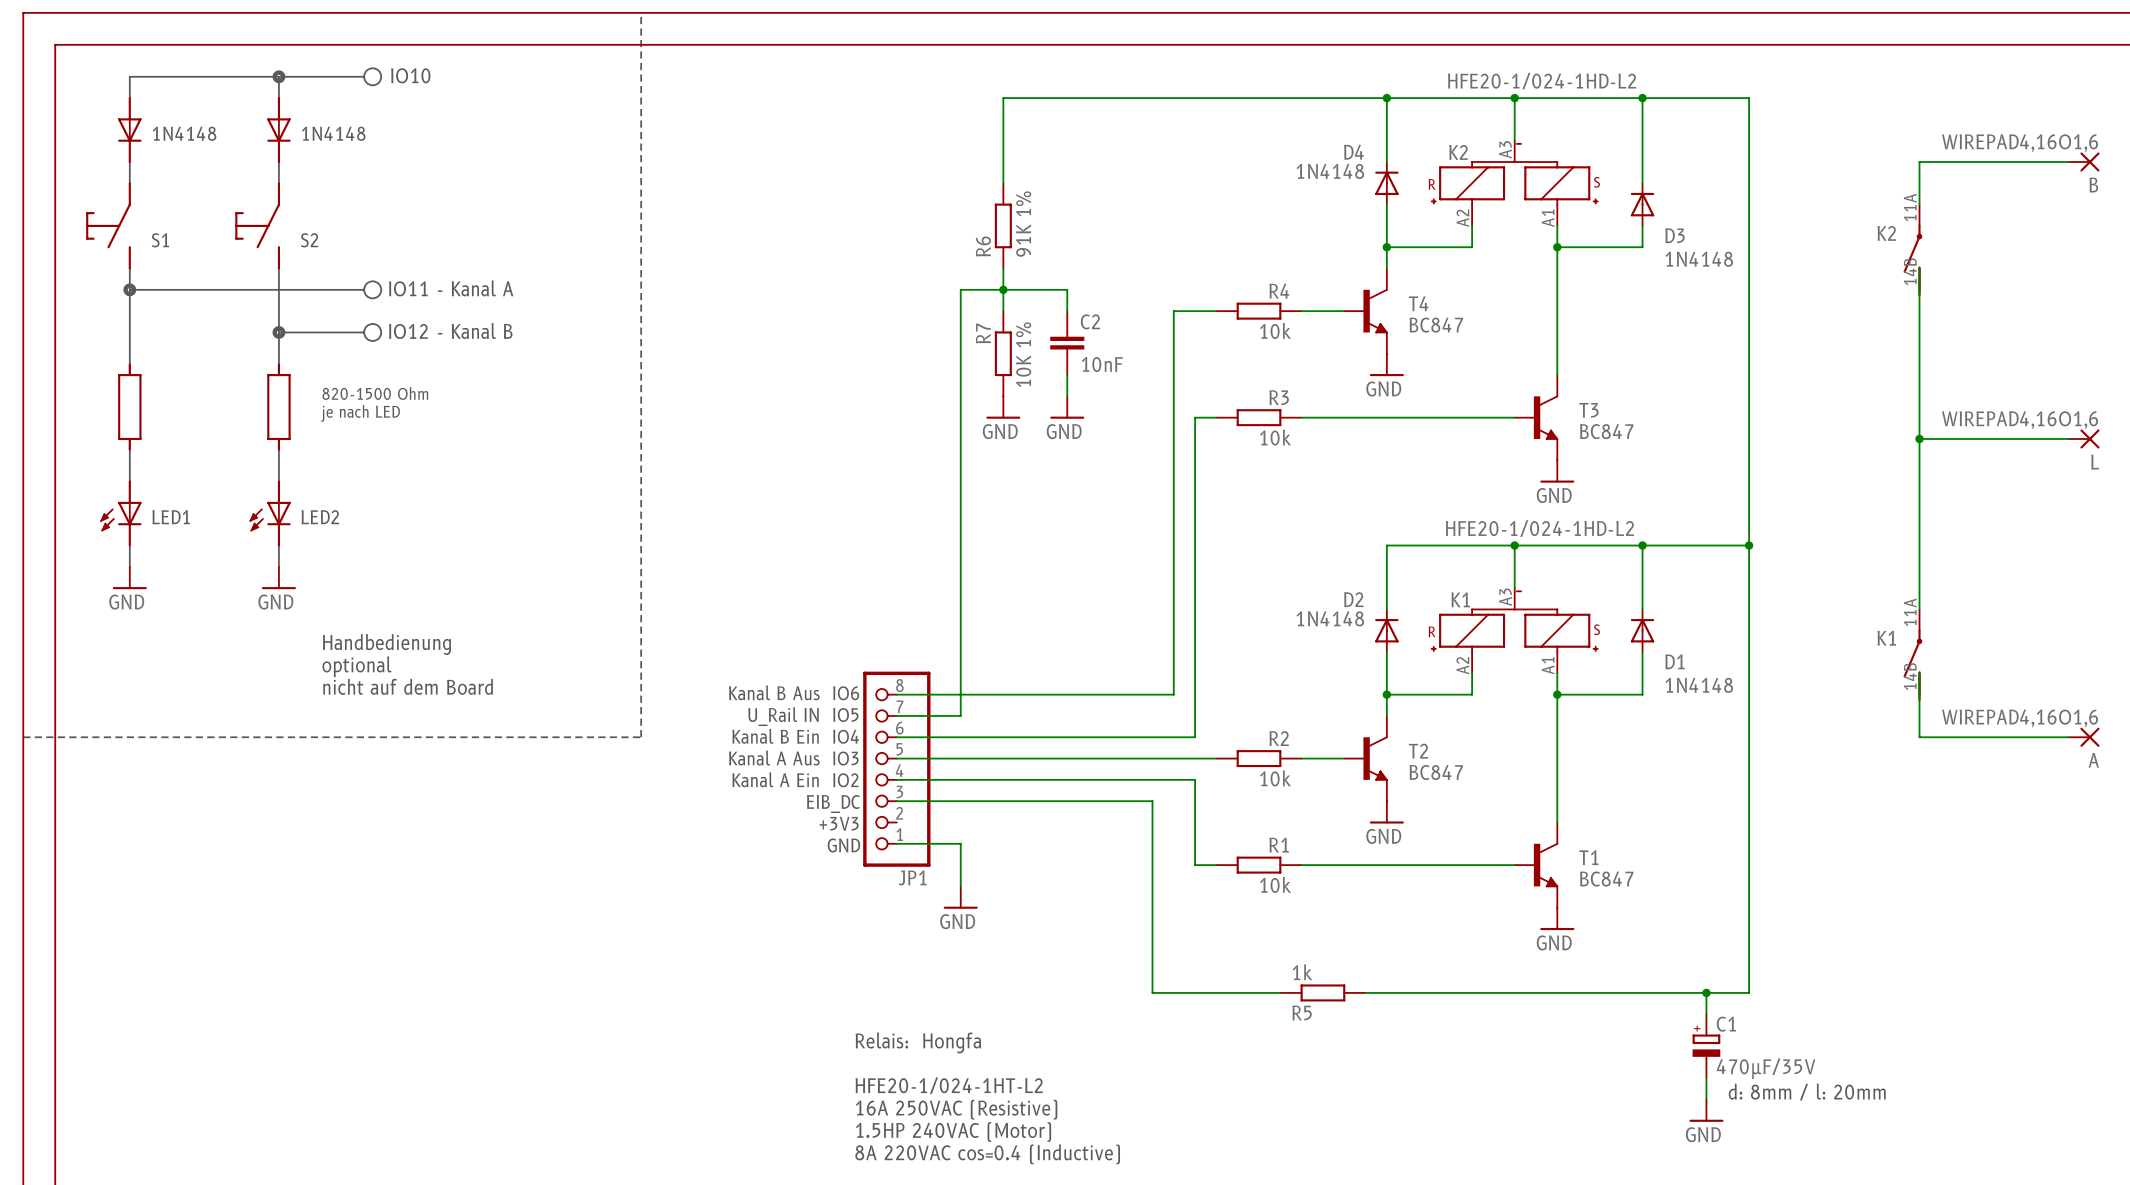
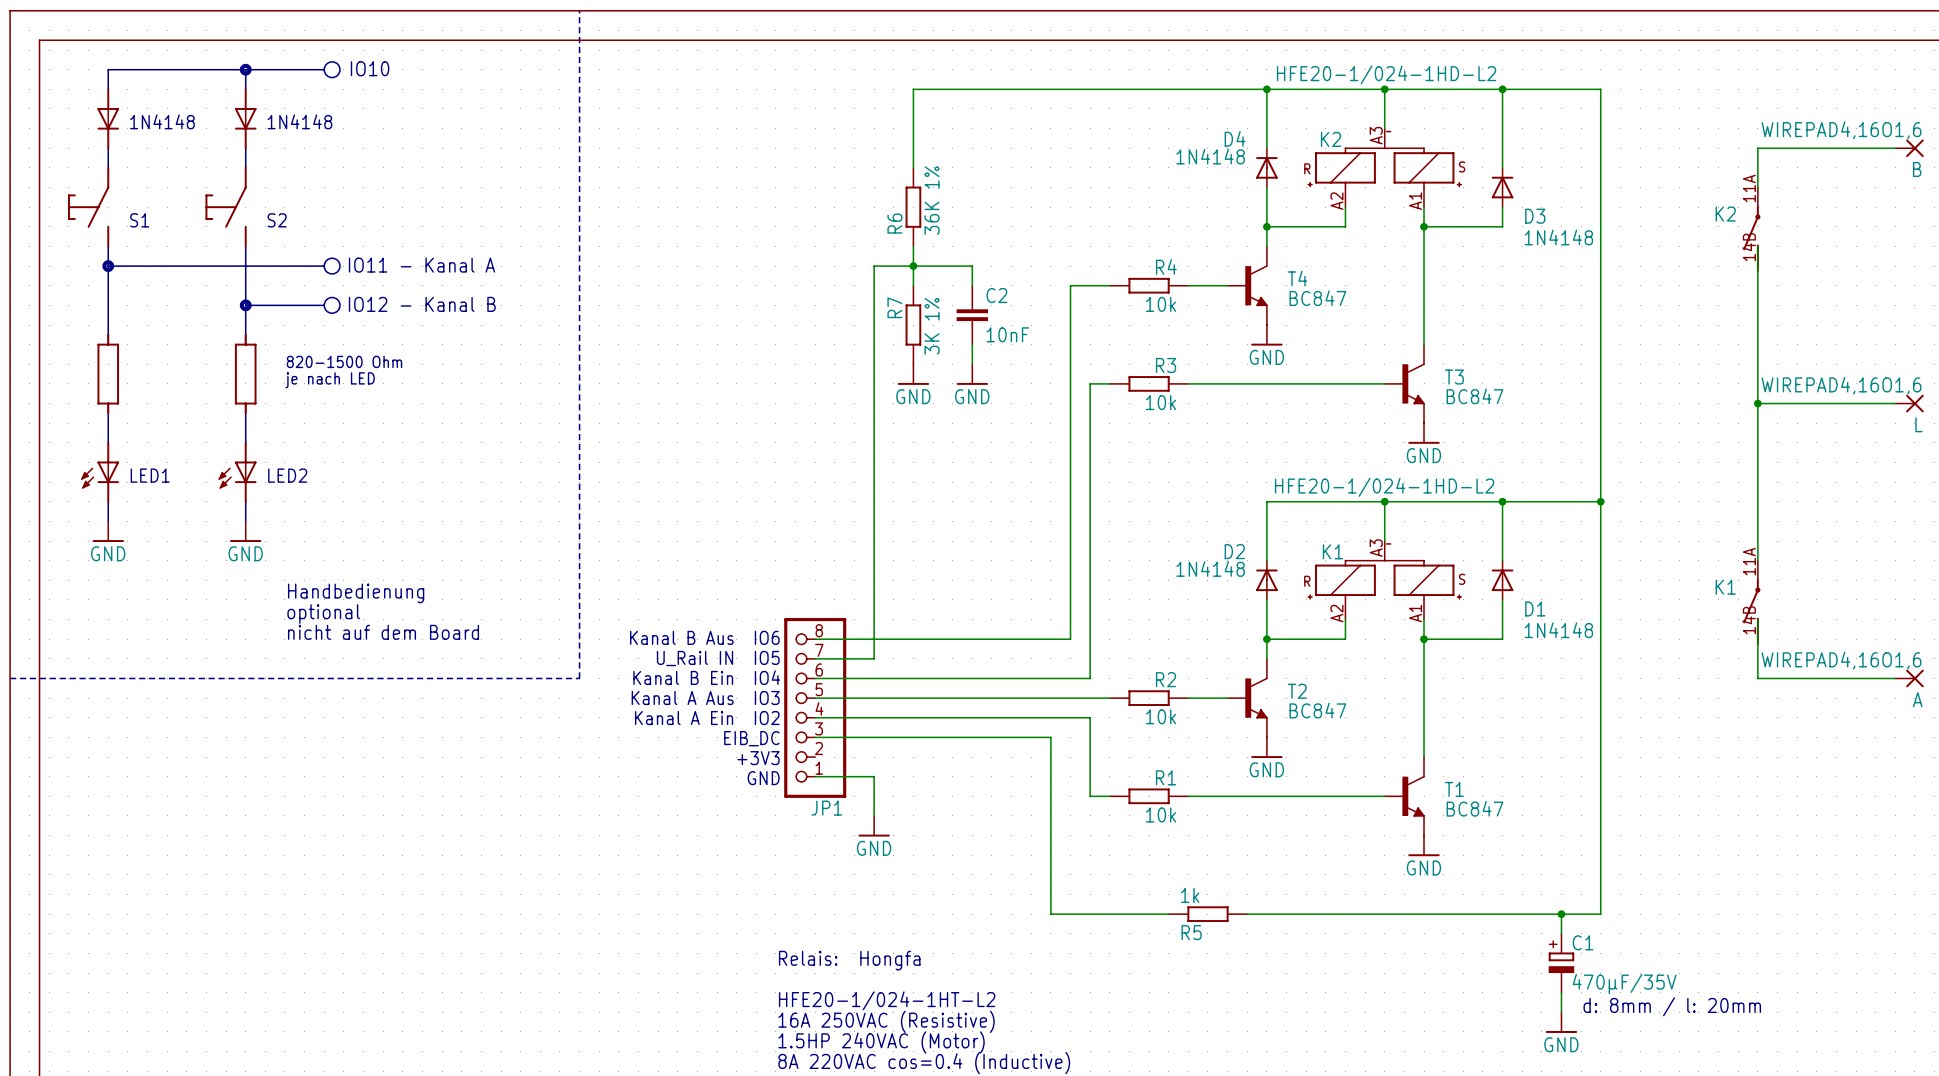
R6 value: 91K 1% (1023, 224) -> 36K 1% (932, 200)
R7 value: 10K 1% (1023, 354) -> 3K 1% (932, 326)

